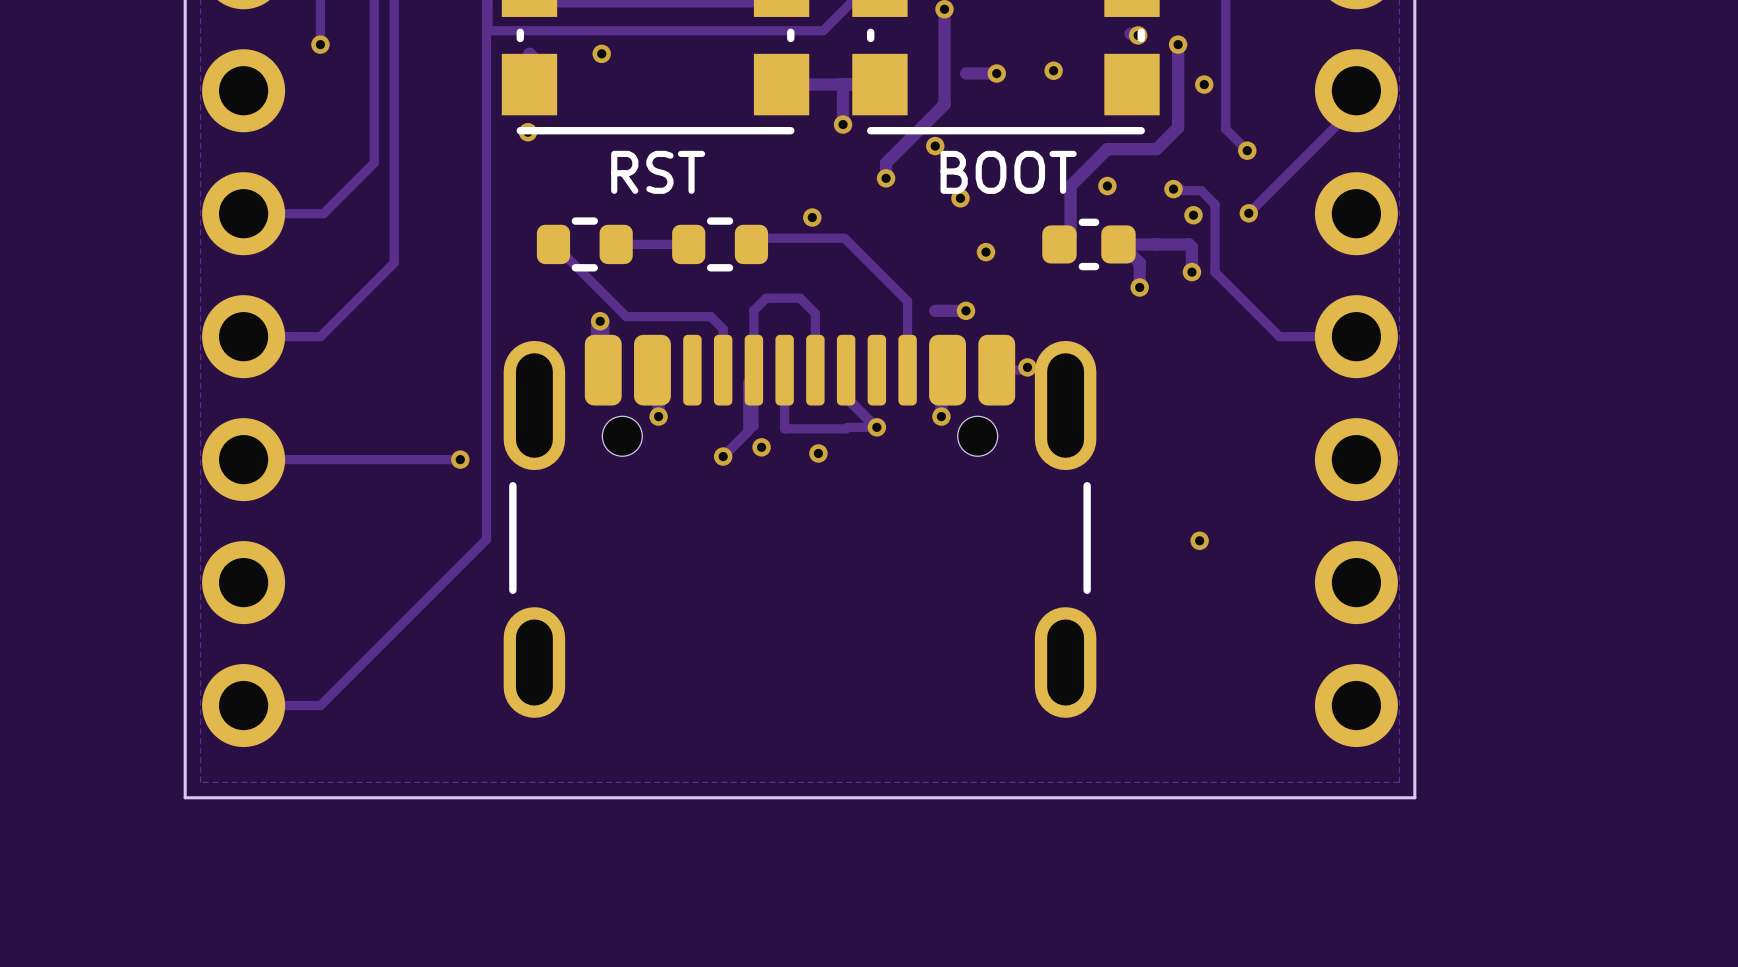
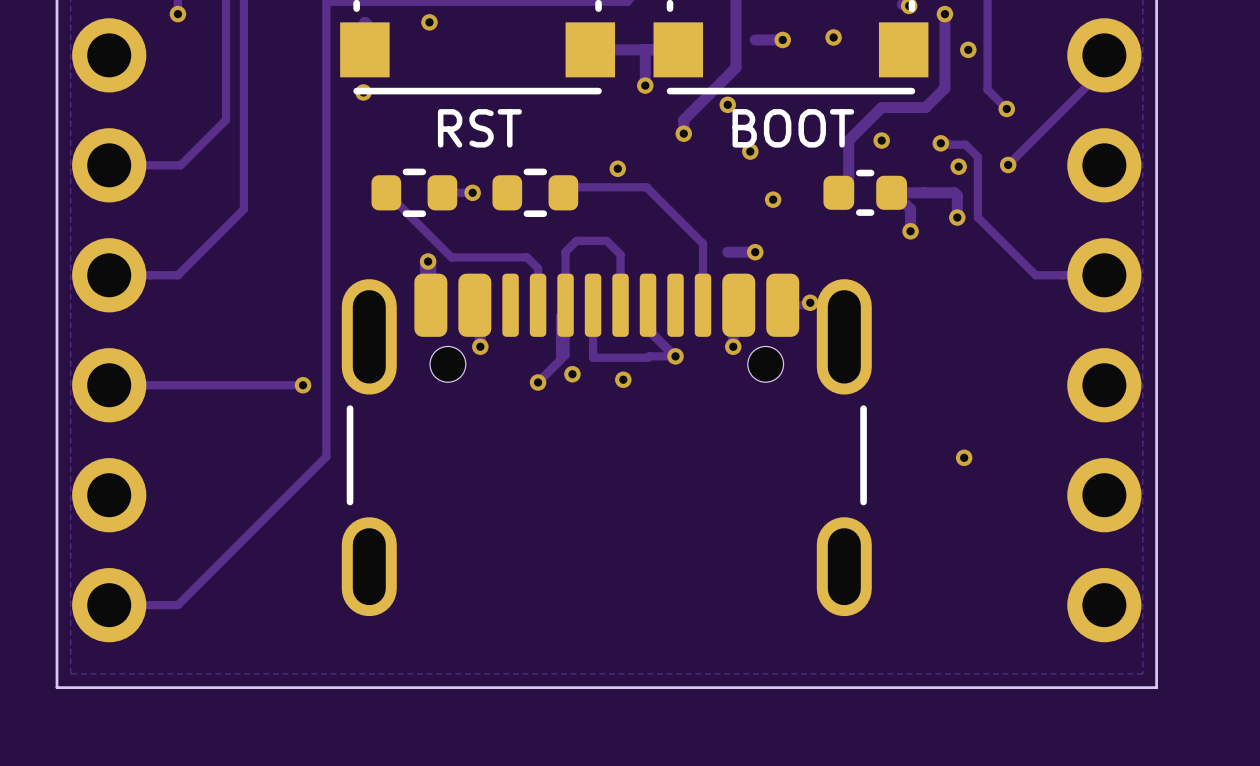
track: (649, 244) (688, 244) -> none
via: none -> (472, 192)

